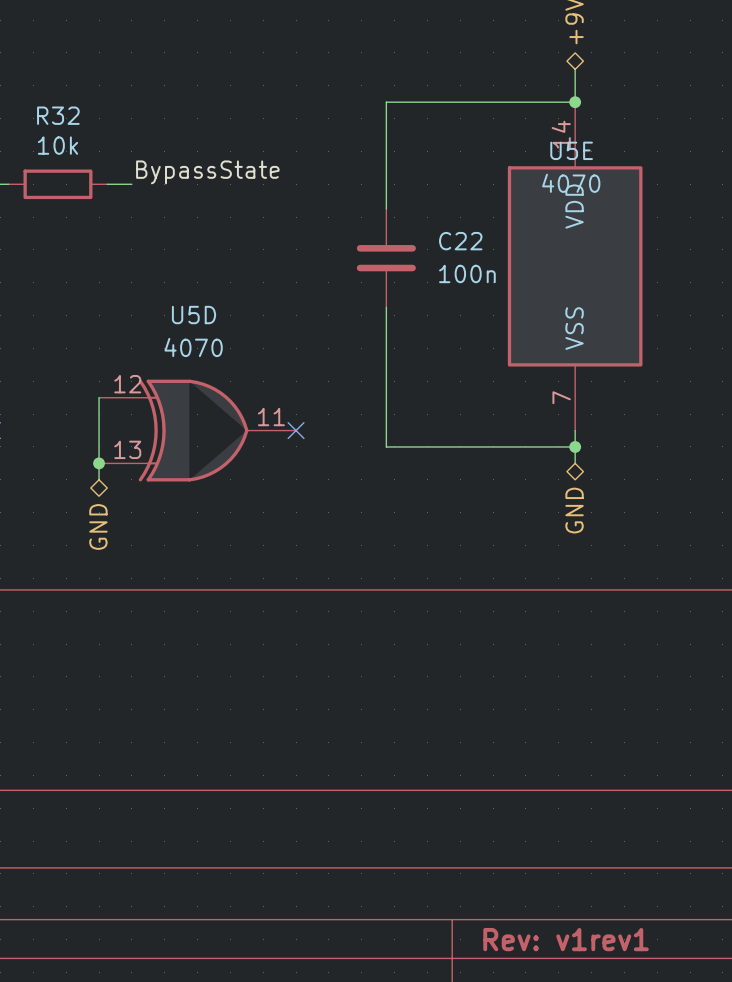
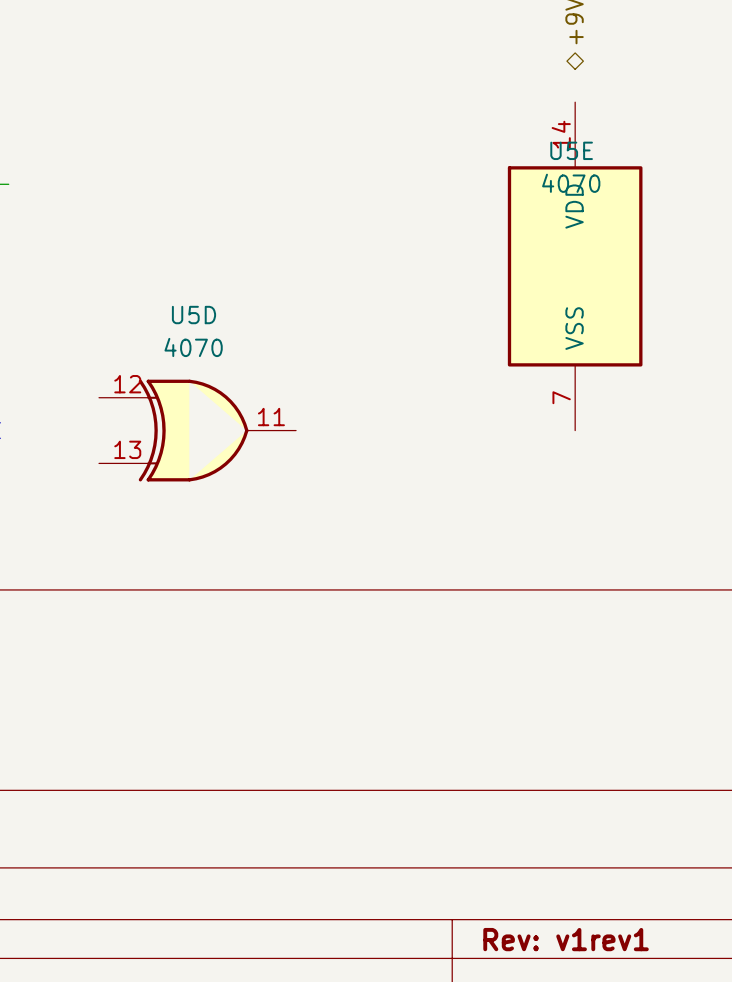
wire: (575, 69) (575, 102) (386, 102) (386, 208) -> none
junction: (575, 102) -> none
label: BypassState (207, 172) -> none
R32: 10k (57, 184) -> none
wire: (107, 184) (131, 184) -> none
C22: 100n (386, 258) -> none
wire: (386, 307) (386, 446) (575, 446) -> none
wire: (99, 397) (99, 479) -> none
no-connect mark: (296, 430) -> none
wire: (575, 430) (575, 463) -> none
junction: (575, 446) -> none
junction: (99, 463) -> none
hierarchical label: GND (574, 510) -> none
hierarchical label: GND (98, 526) -> none

